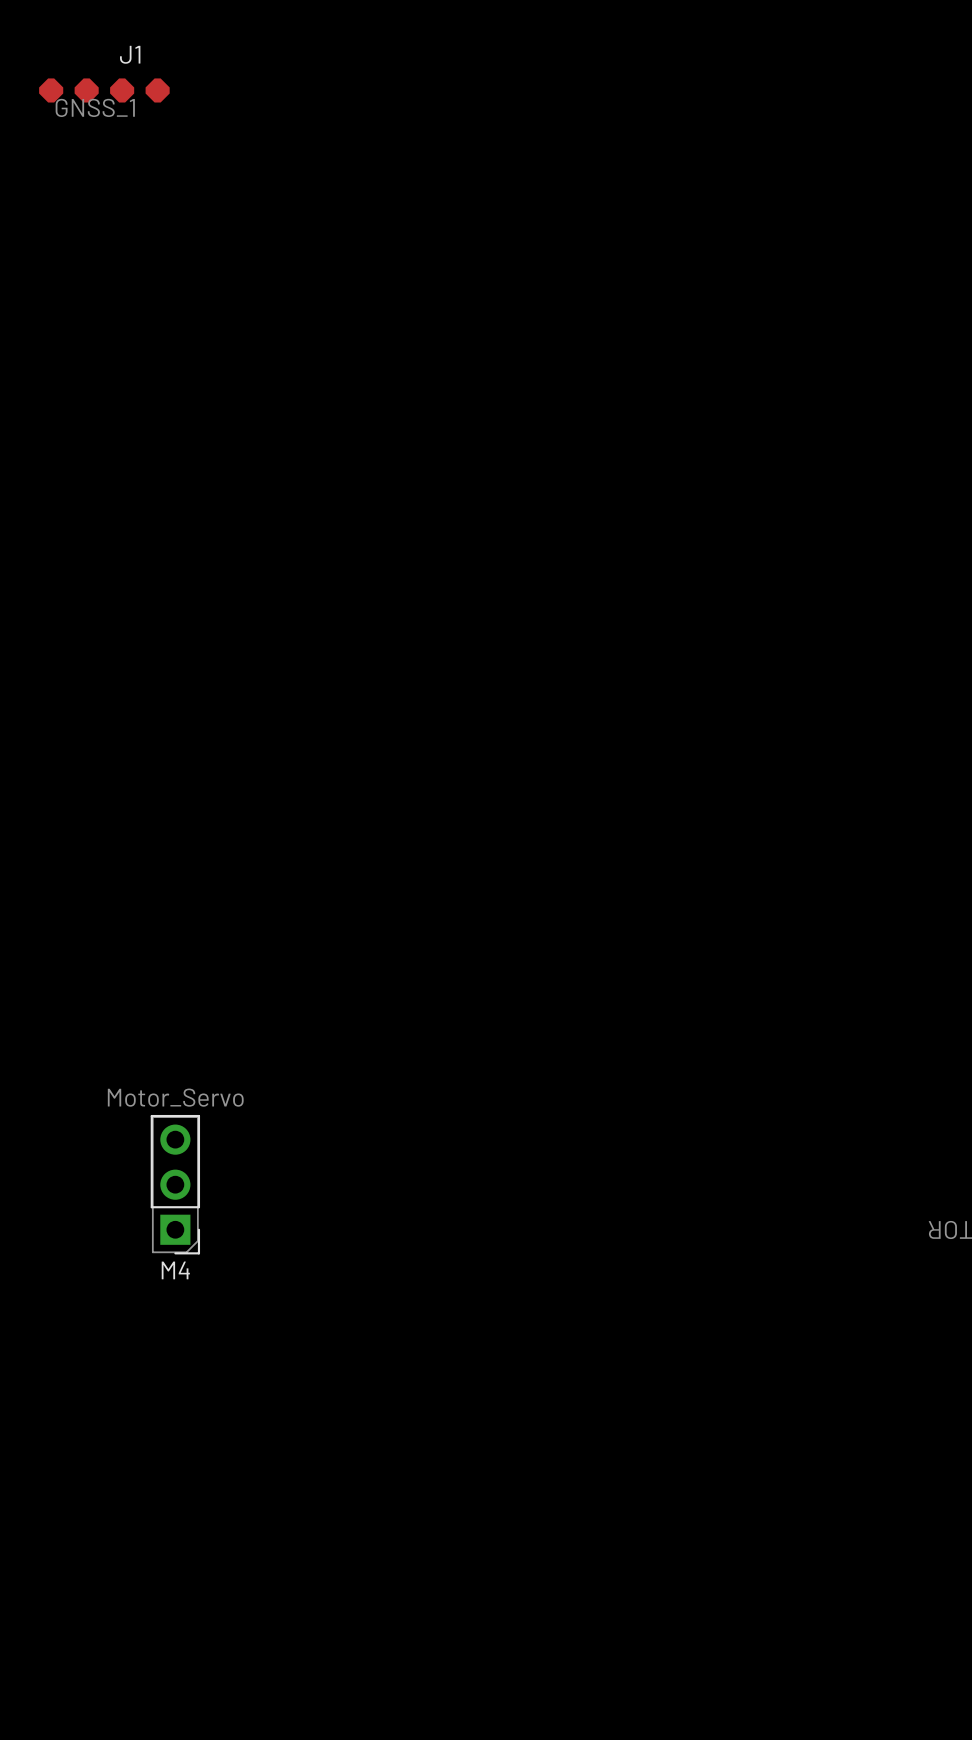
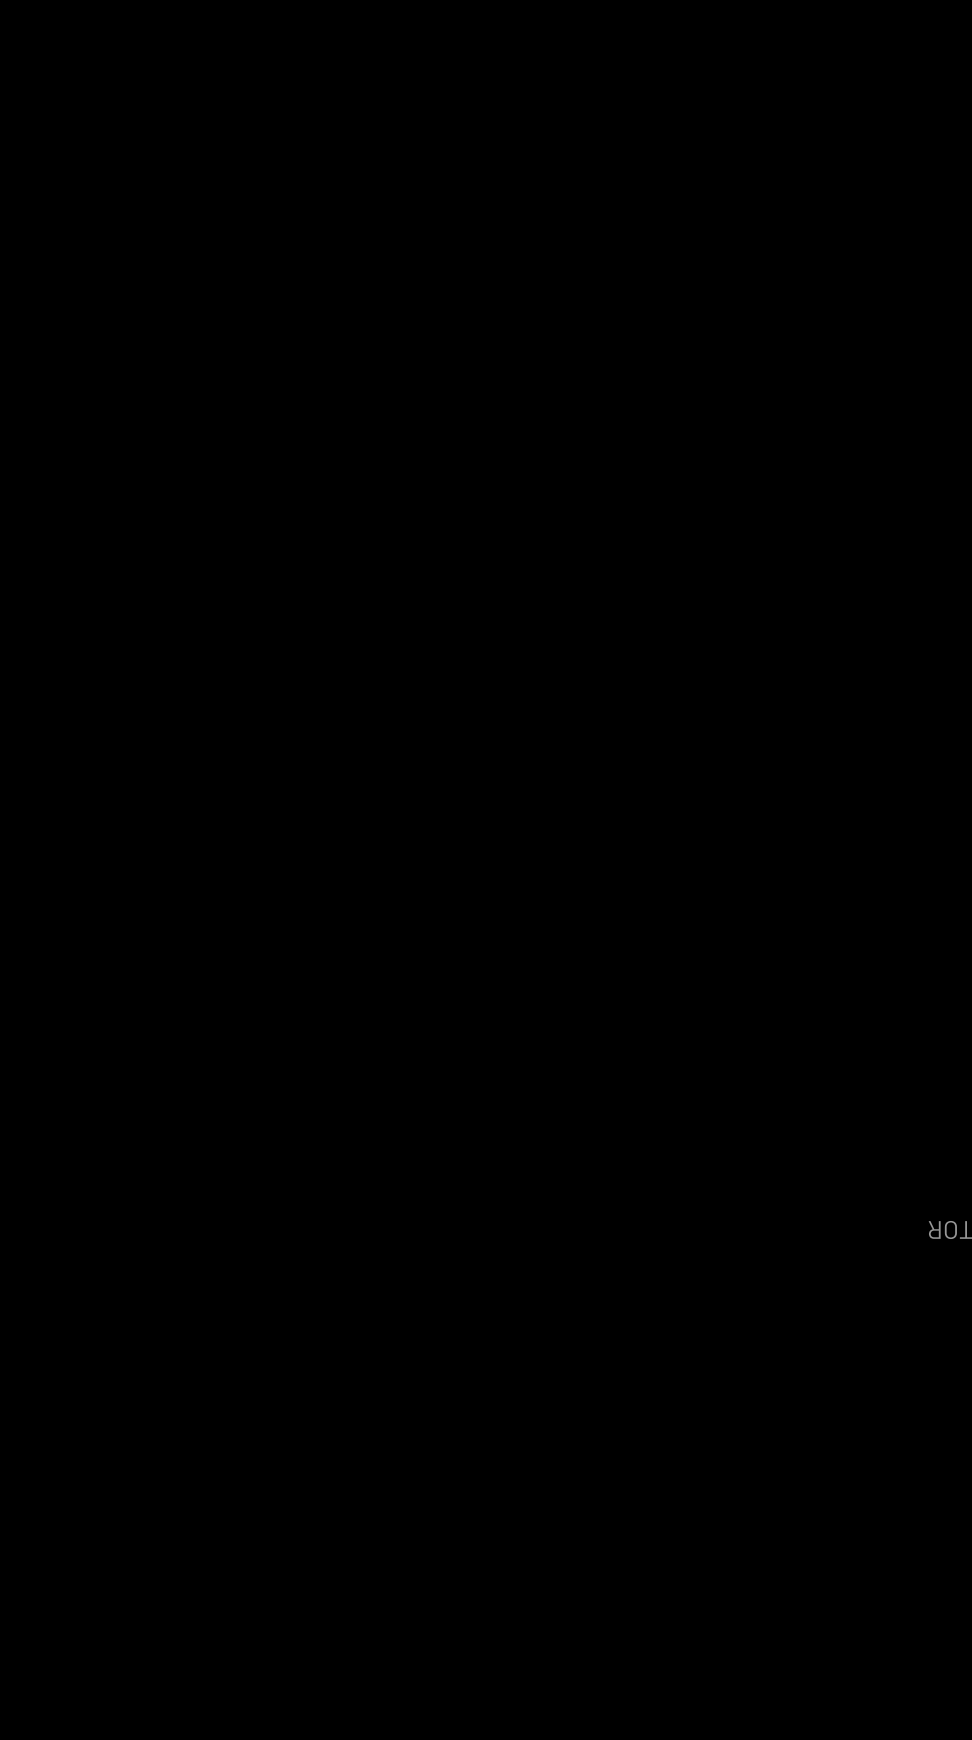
J1: GNSS_1 (104, 90) -> none
M4: Motor_Servo (175, 1184) -> none

